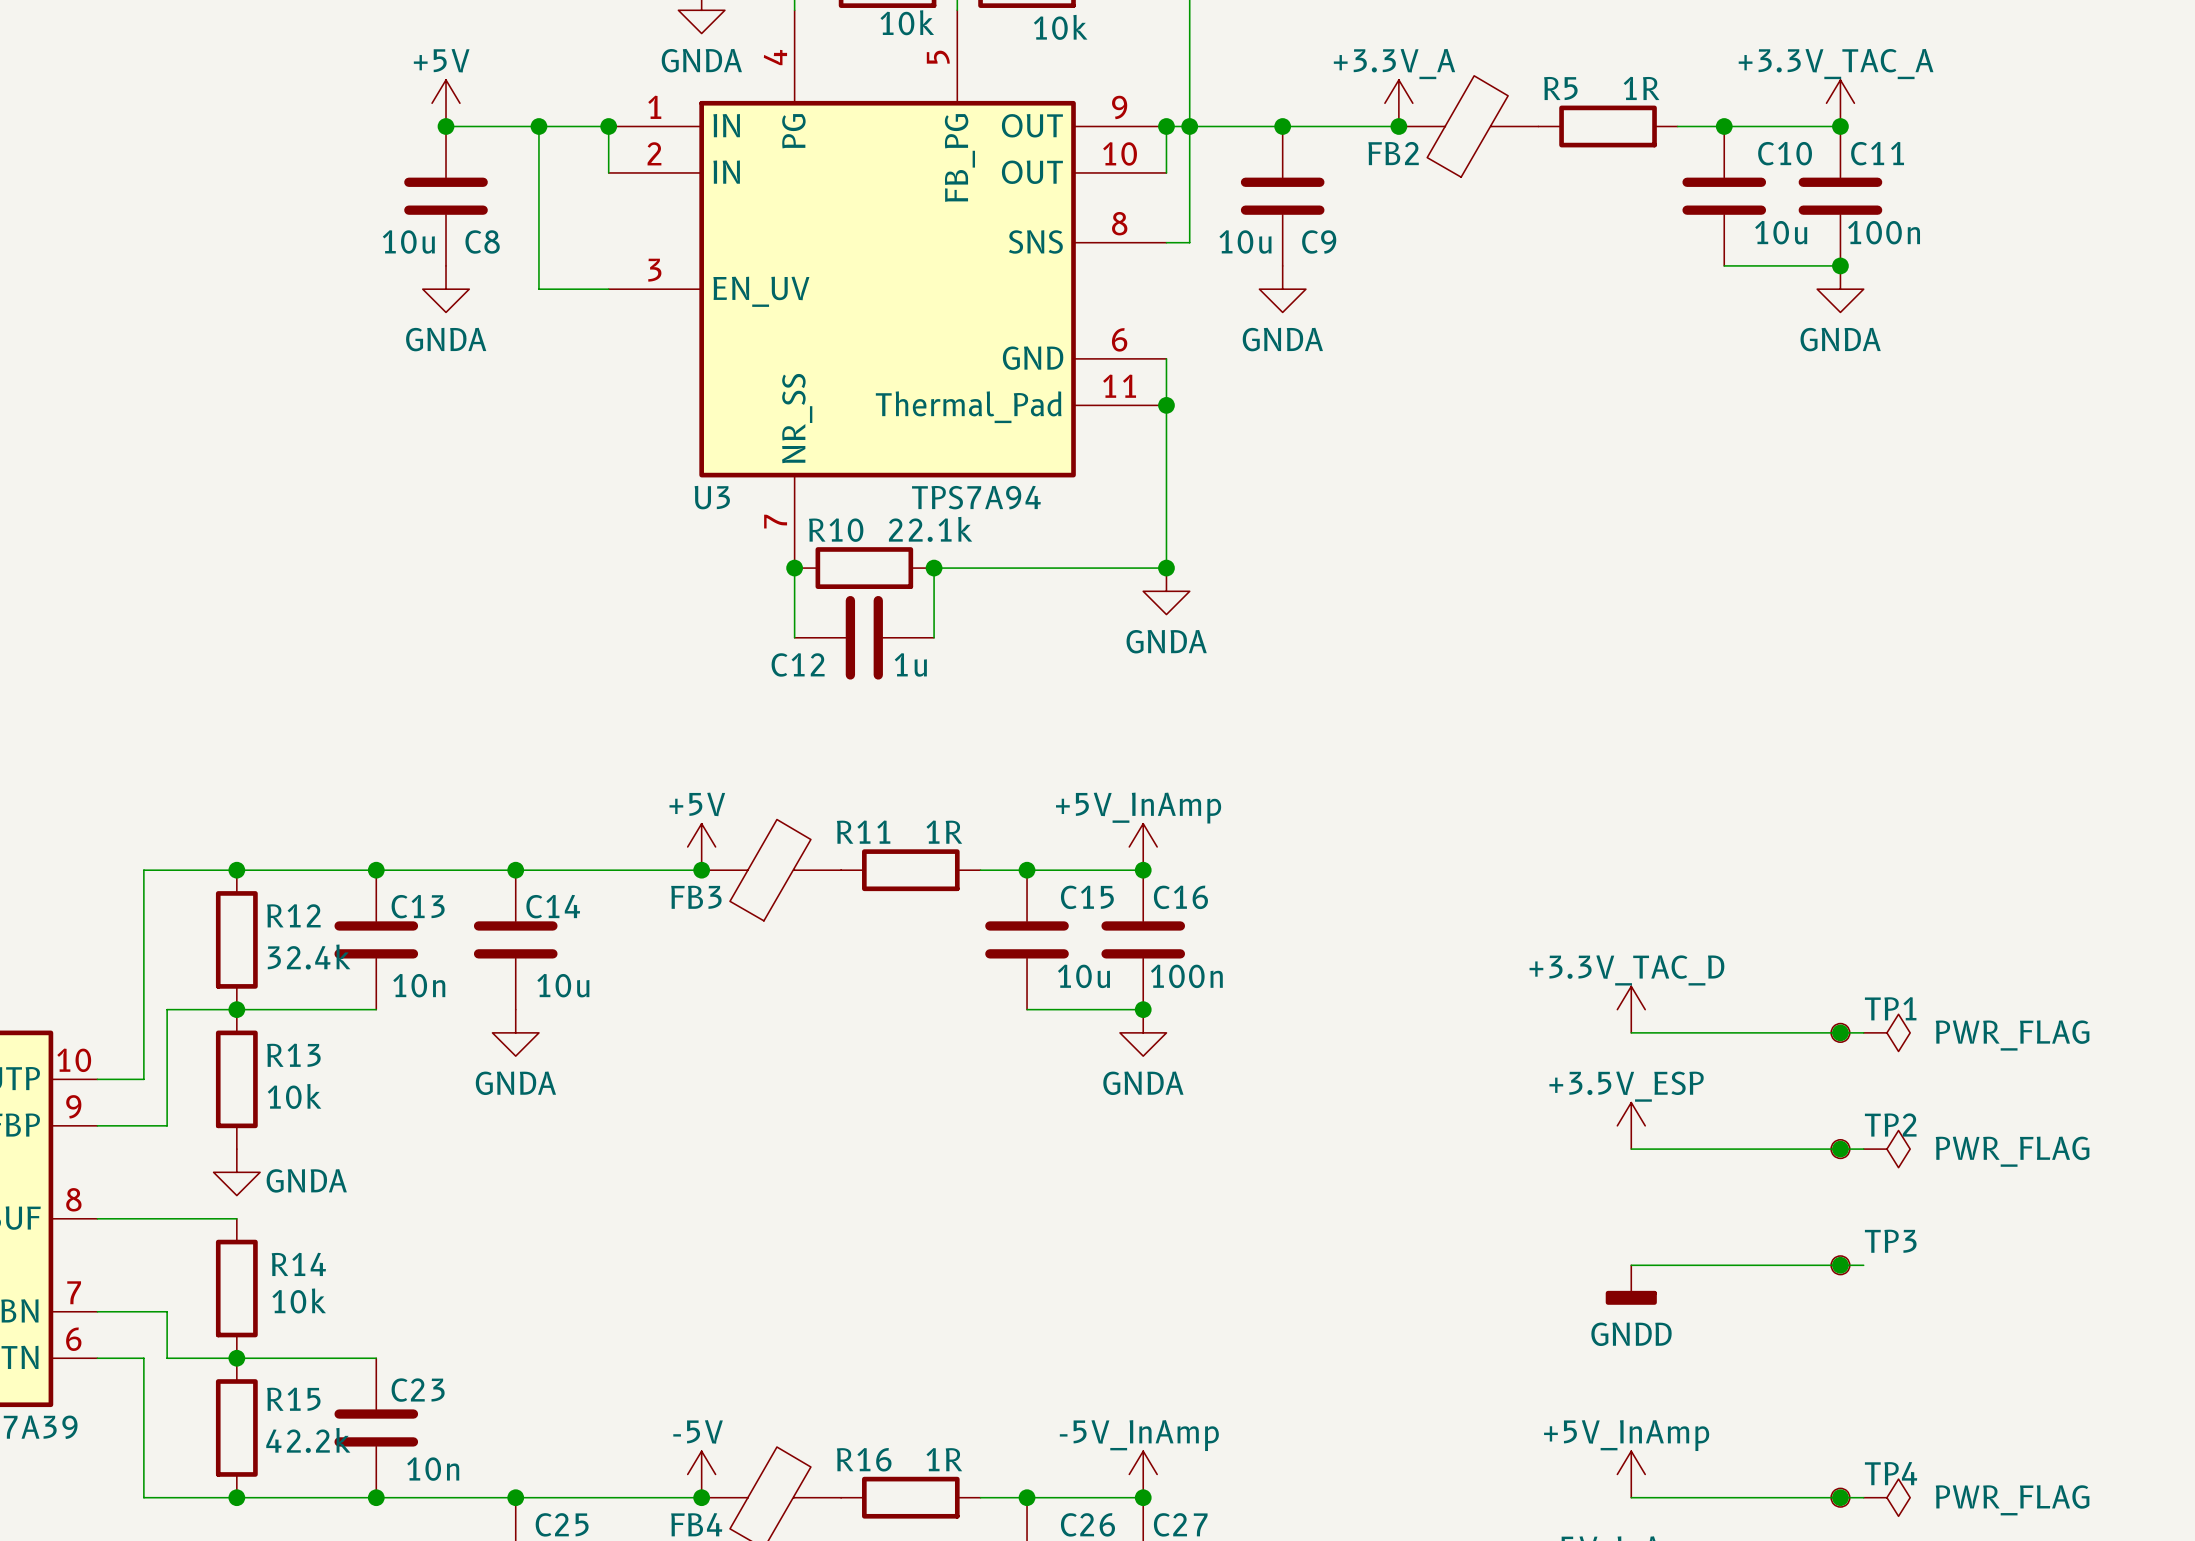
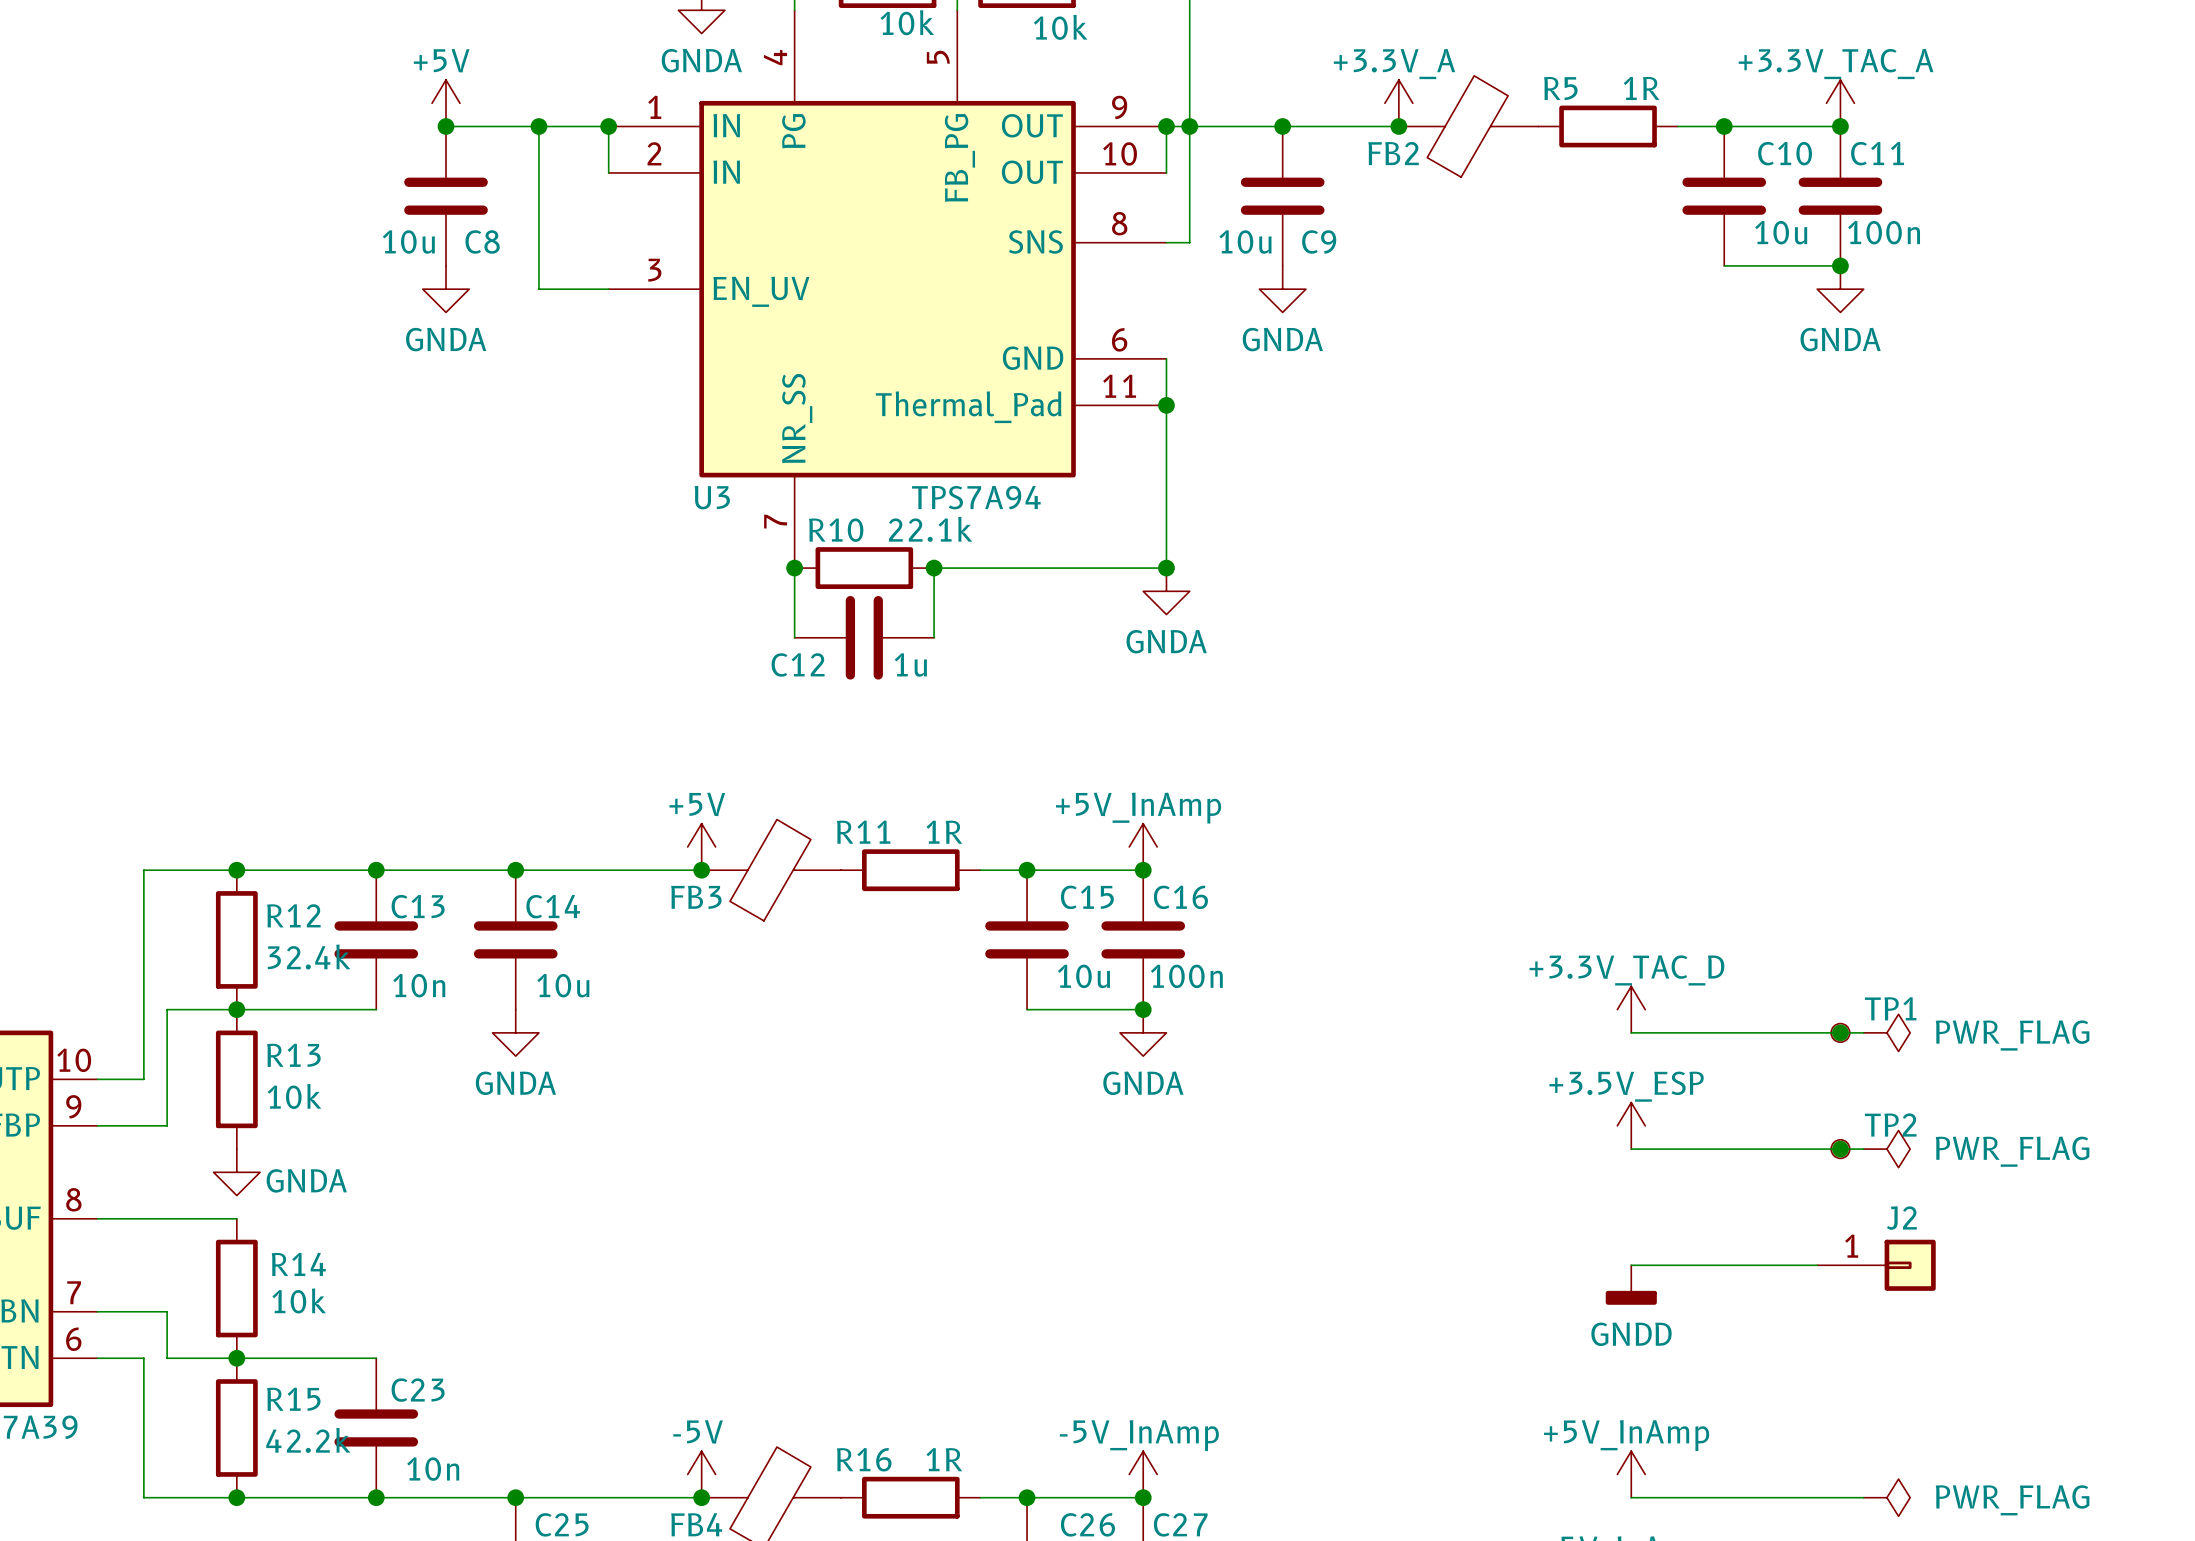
junction: (1840, 1265) -> none
TP3: (1840, 1265) -> none
J2: none -> (1876, 1265)
junction: (1840, 1497) -> none
TP4: (1840, 1497) -> none

